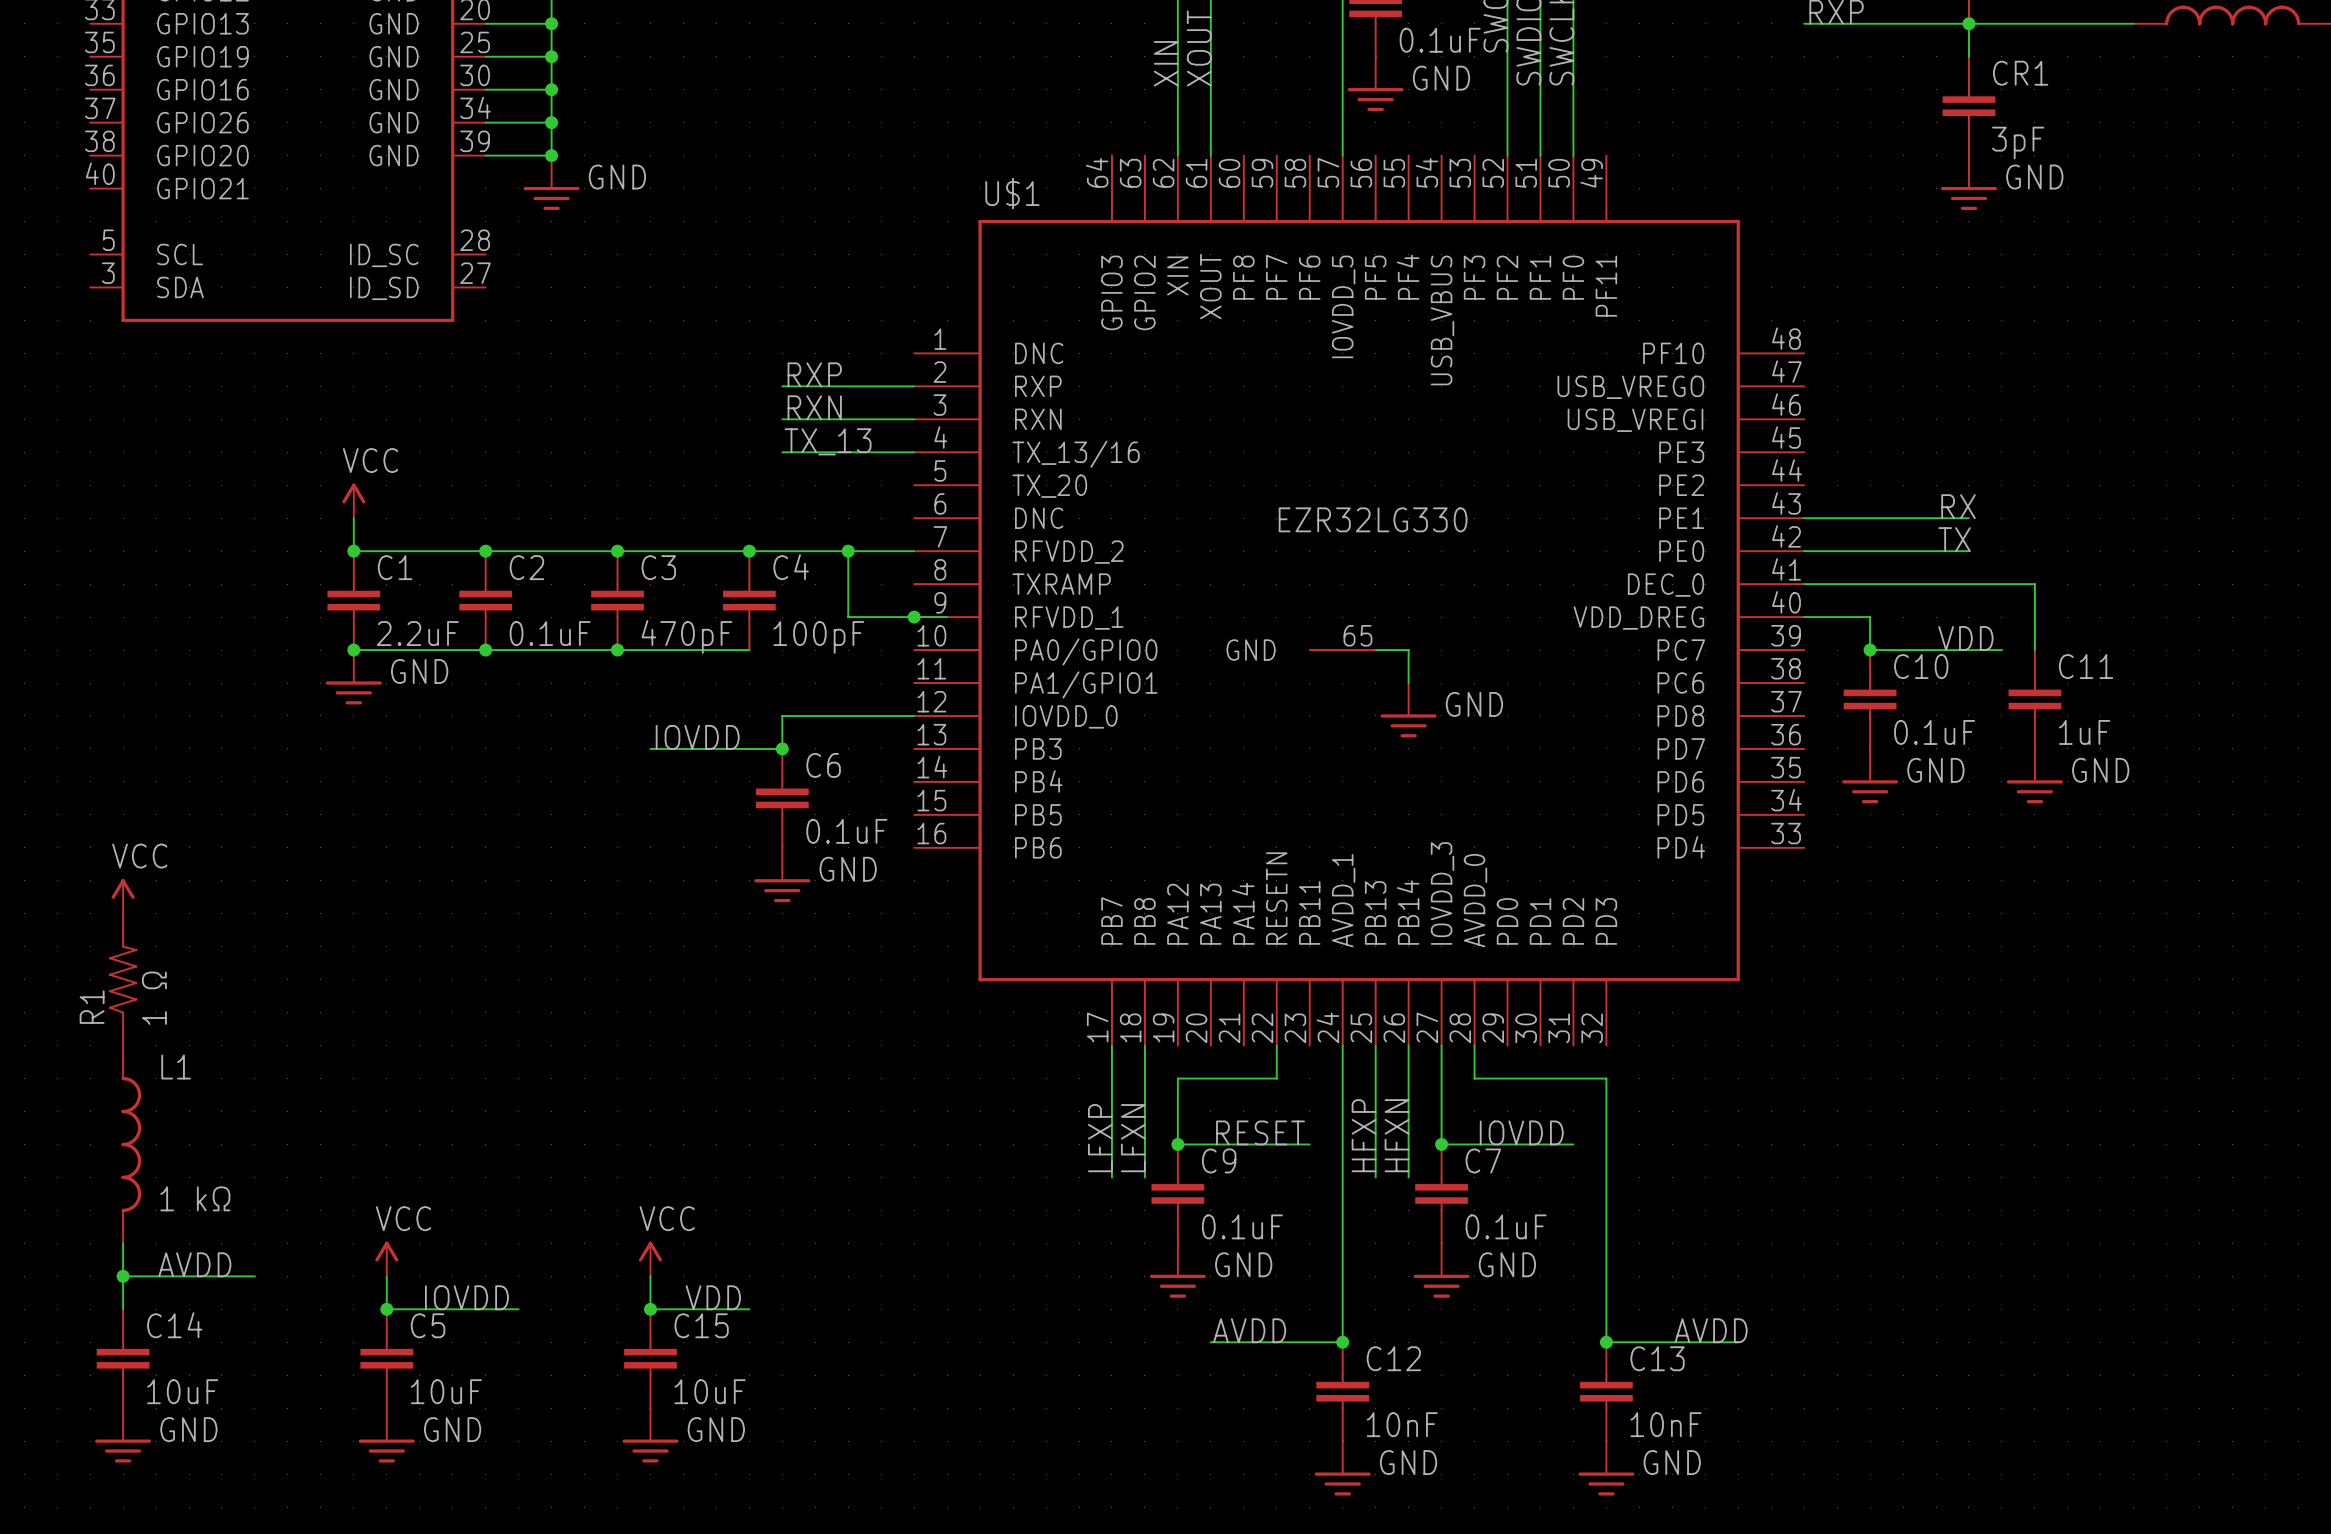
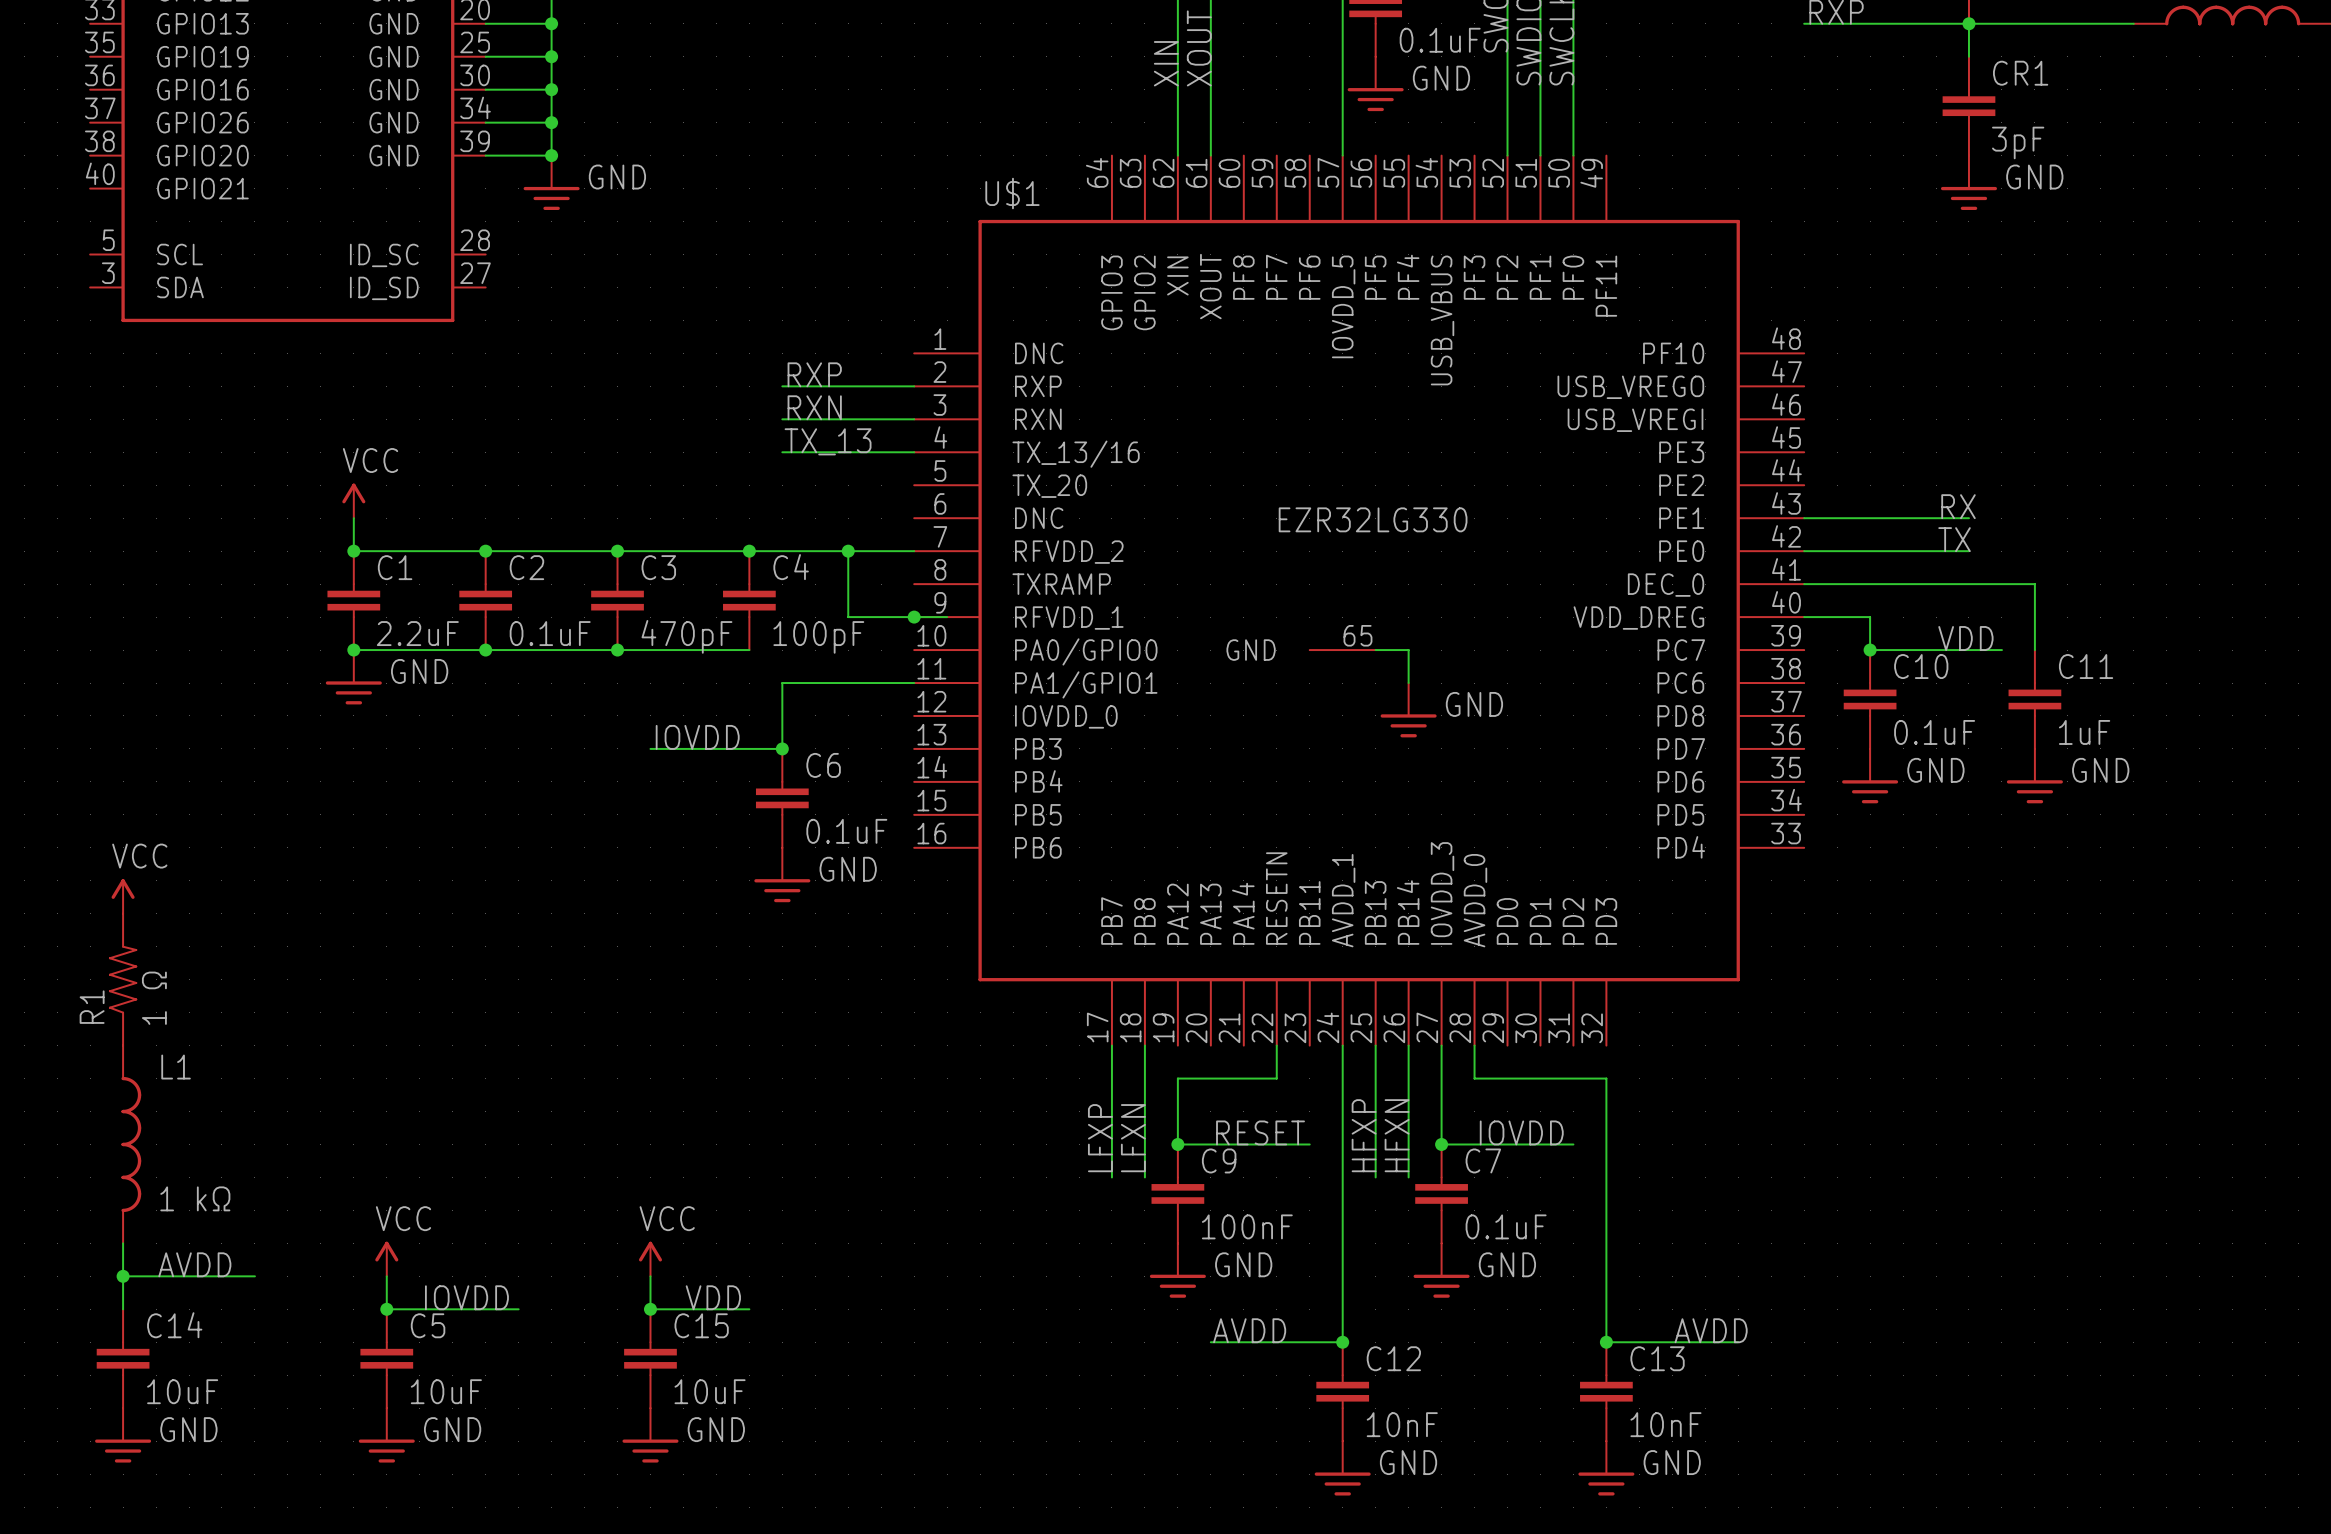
wire: (782, 715) (914, 715) -> (782, 715) (782, 683) (914, 683)
C9 value: 0.1uF (1242, 1226) -> 100nF (1247, 1226)

